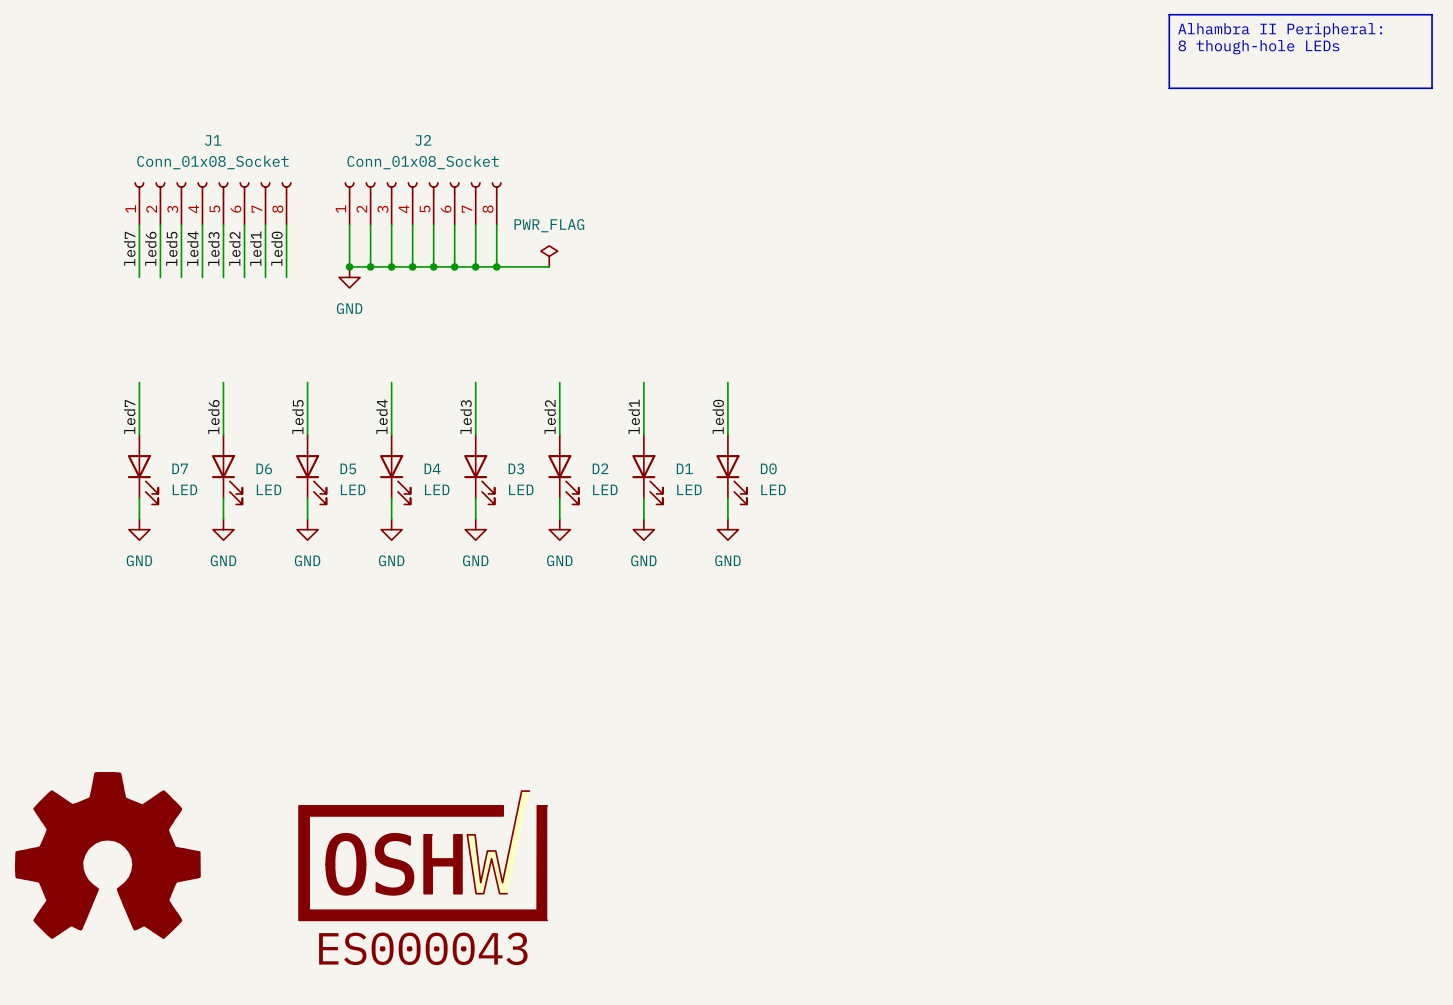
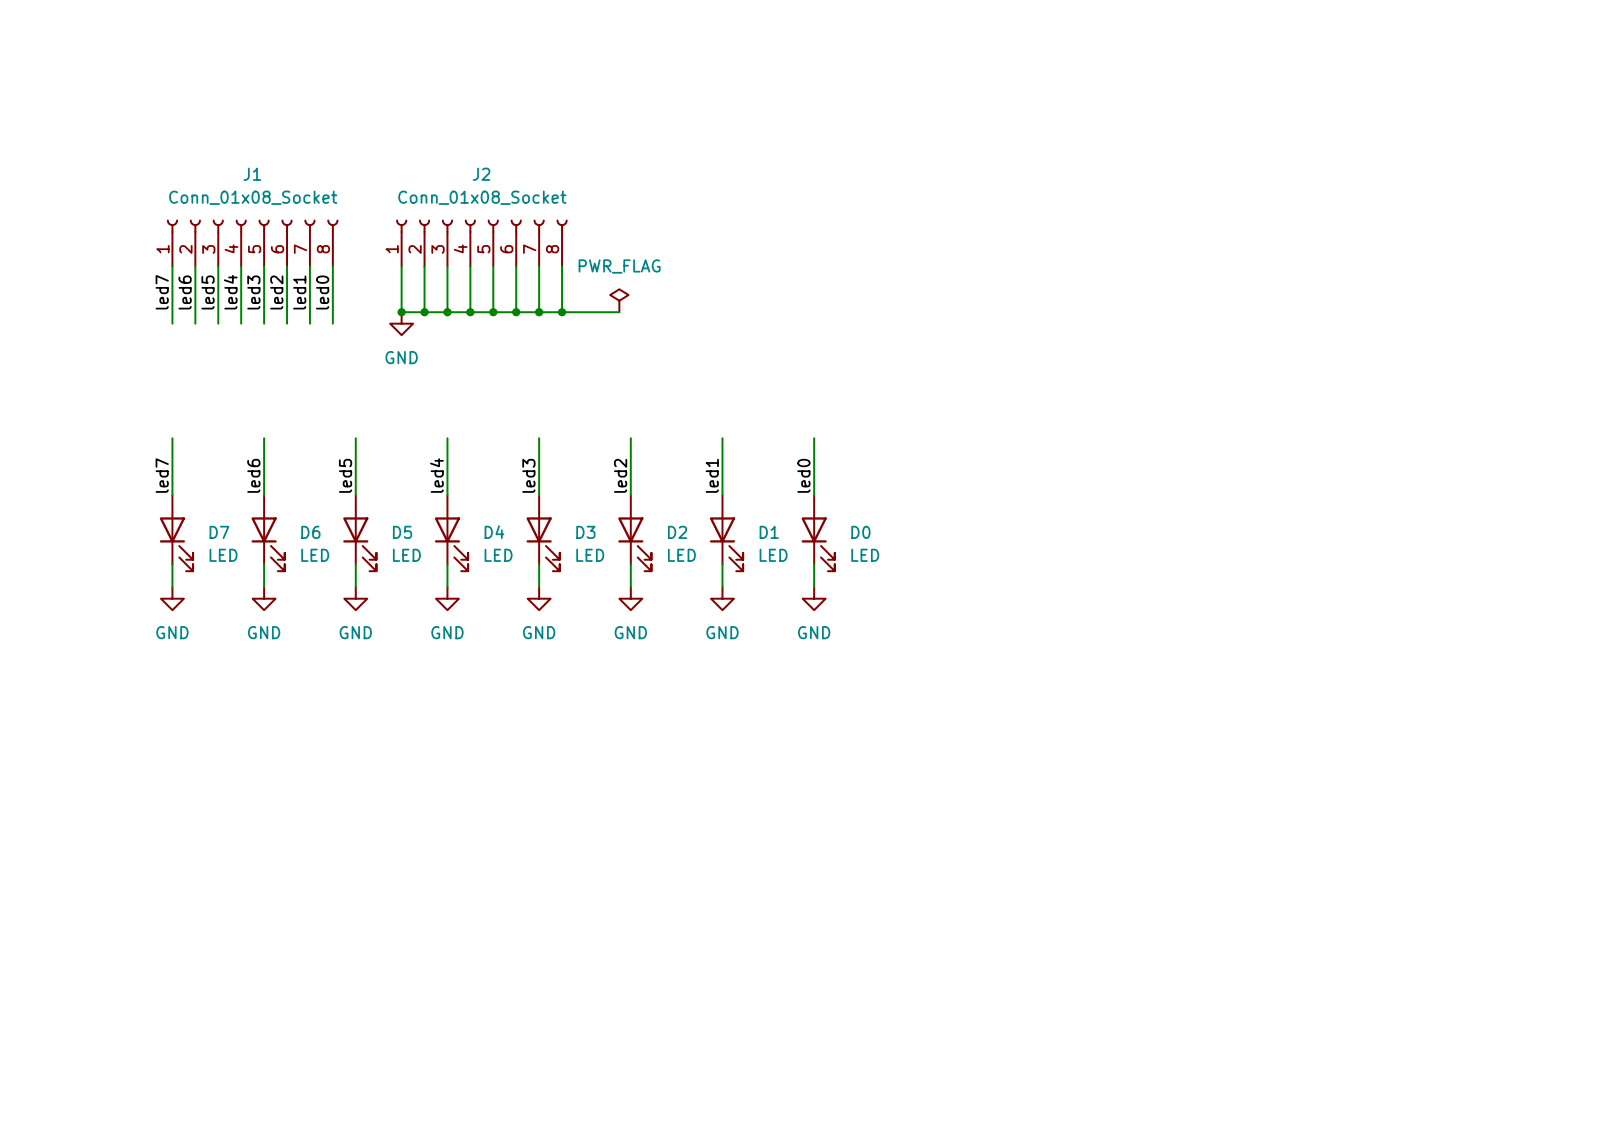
line: (1169, 14) (1432, 14) (1432, 88) (1169, 88) (1169, 14) -> none
text: Alhambra II Peripheral: (1280, 30) -> none
text: 8 though-hole LEDs (1258, 47) -> none
power symbol: (107, 855) -> none
part: (423, 855) -> none

